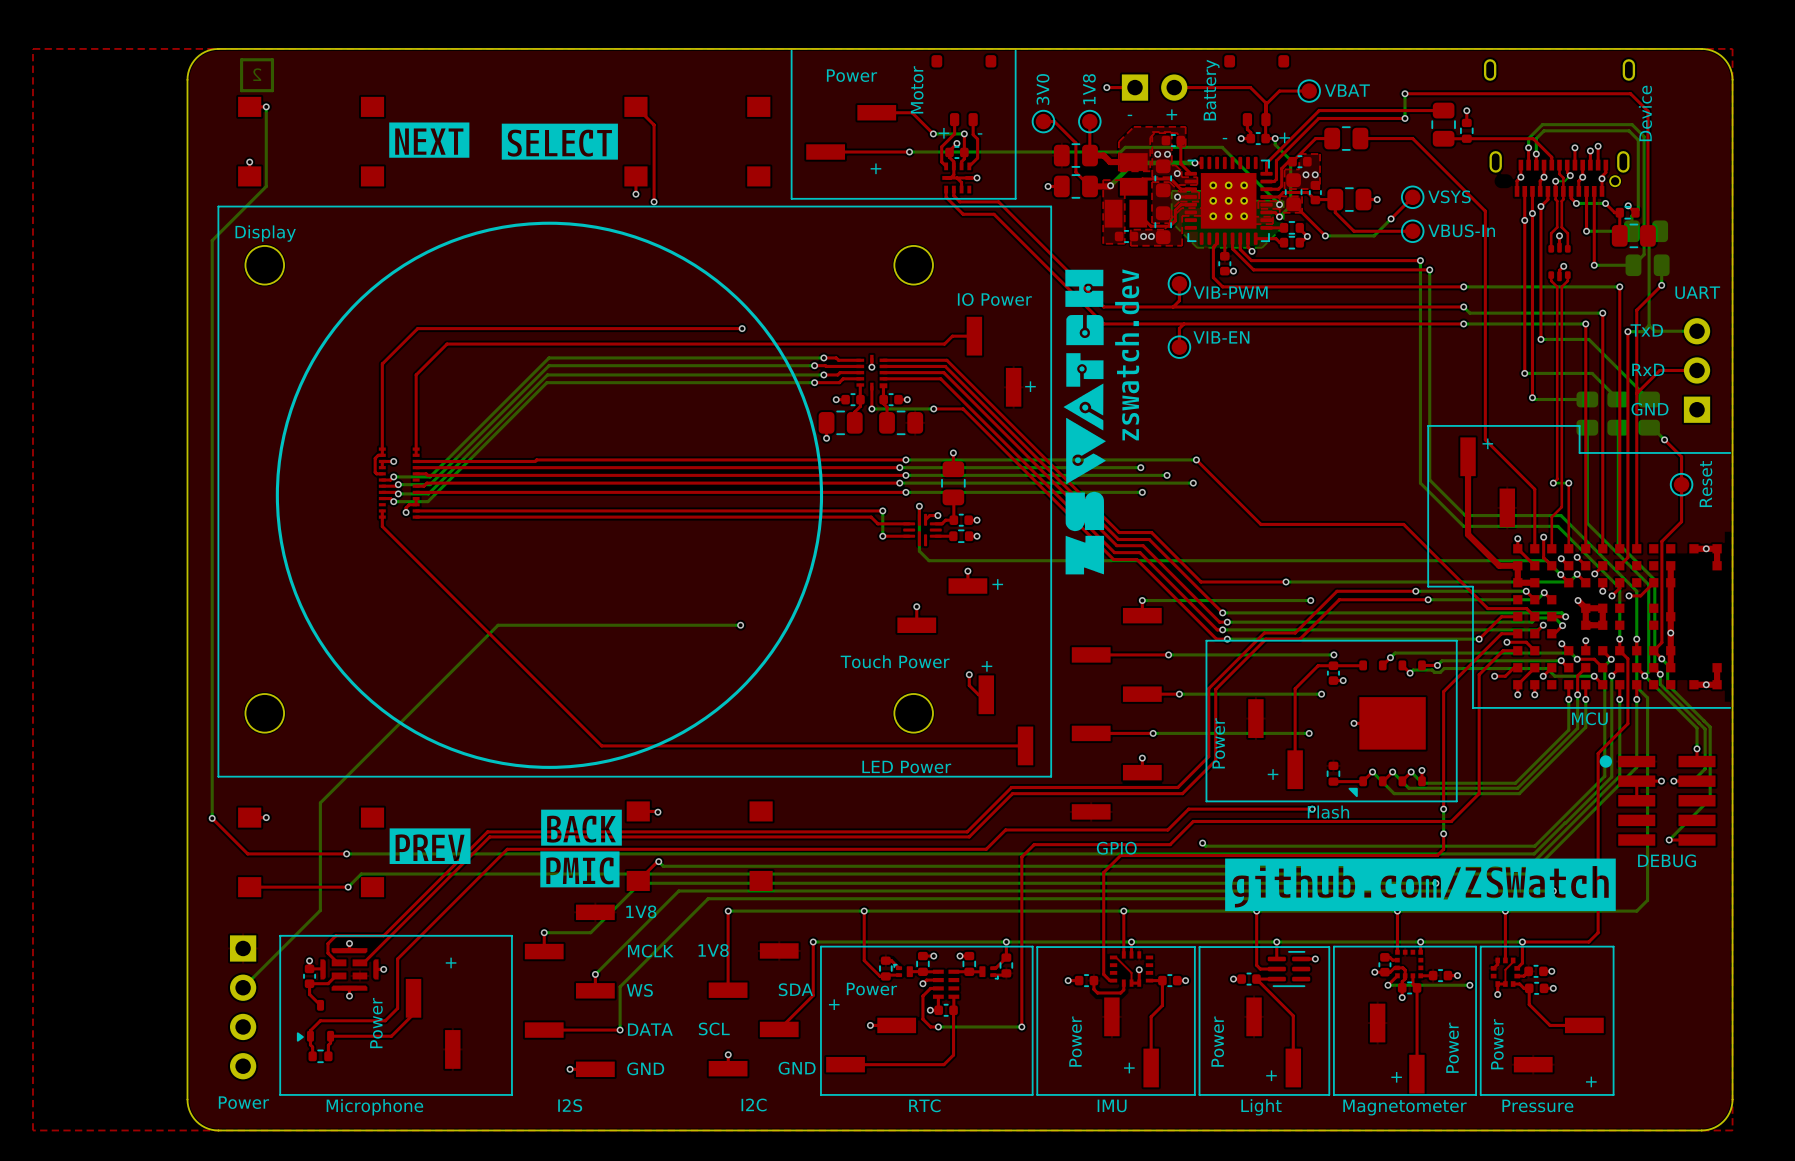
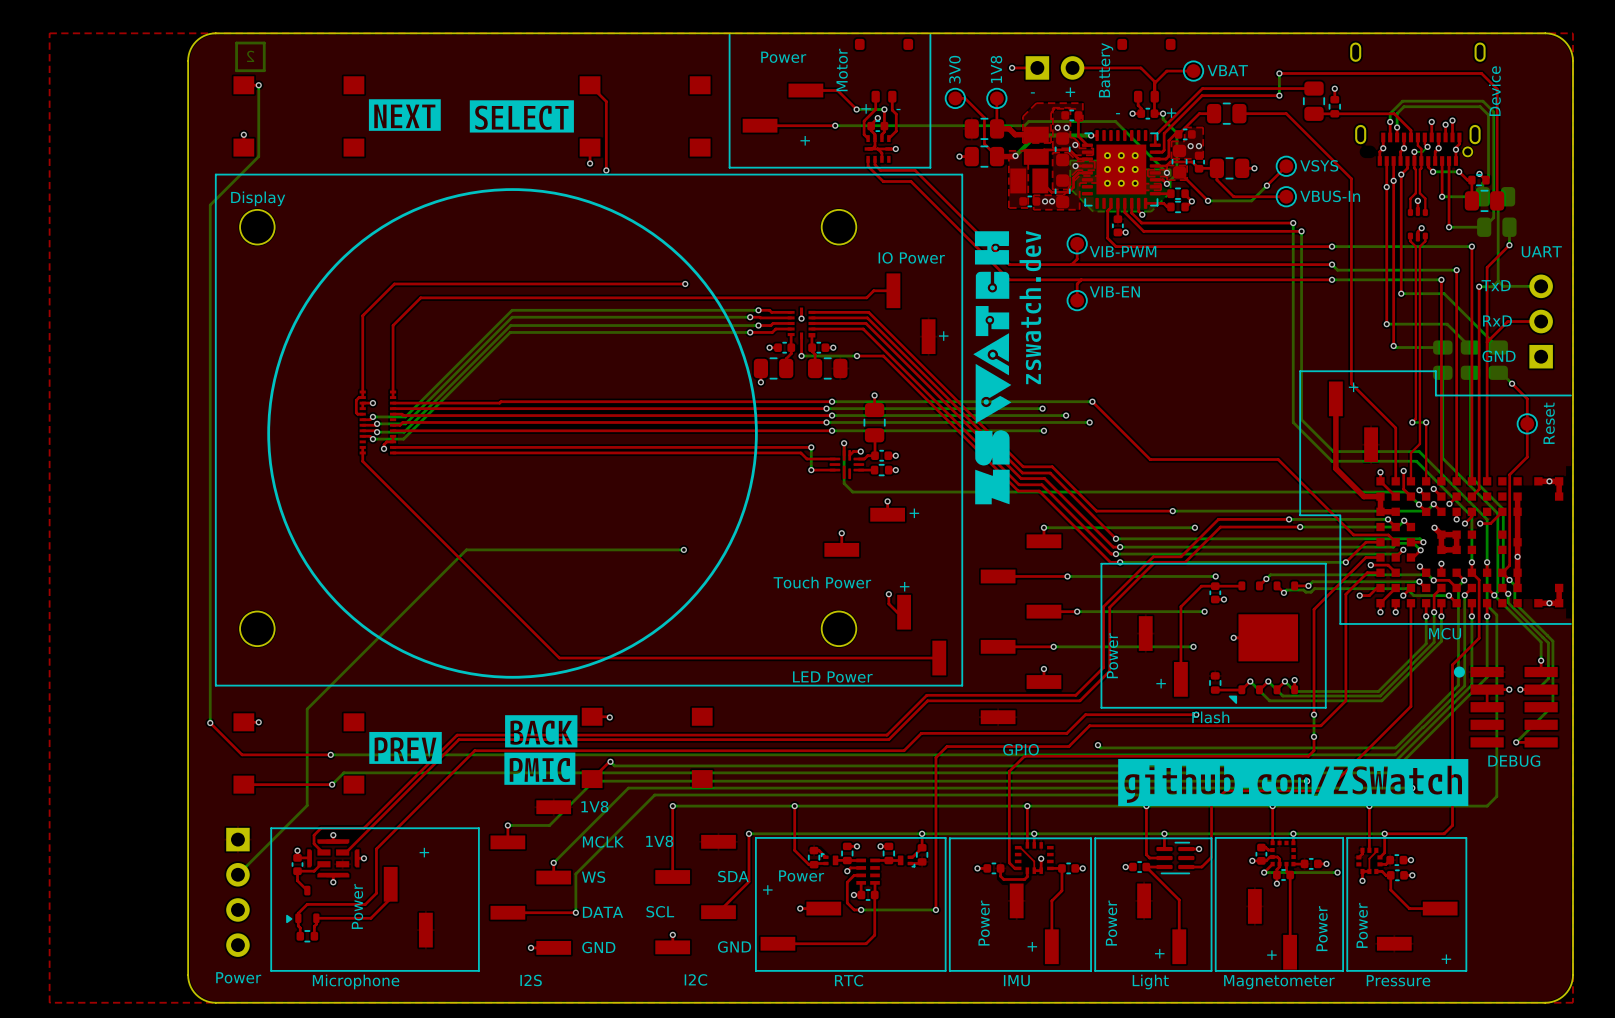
top track: none -> (1410, 603) (1410, 706) (1326, 790) (1225, 790) (1211, 804) (1211, 857) (1201, 867) (1186, 867)

